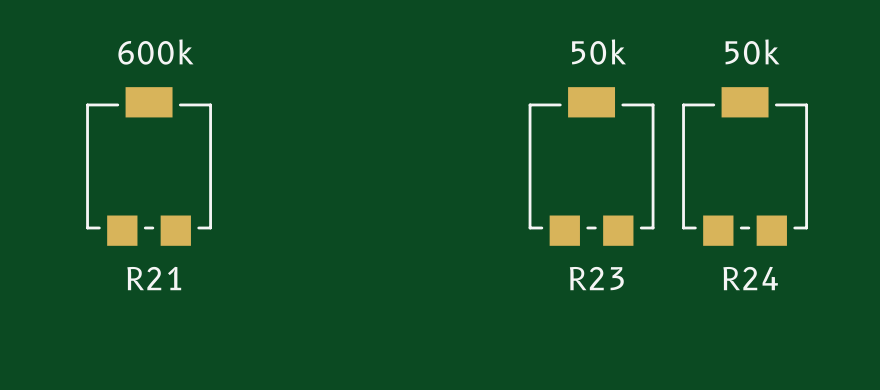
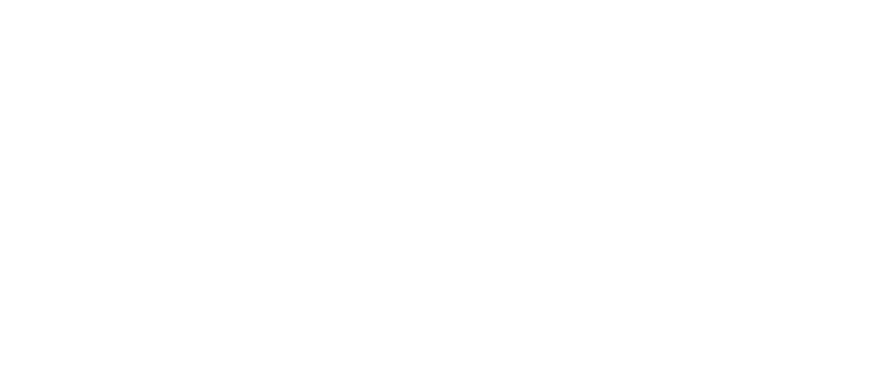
R21: 600k (149, 166) -> none
R23: 50k (591, 166) -> none
R24: 50k (745, 166) -> none

